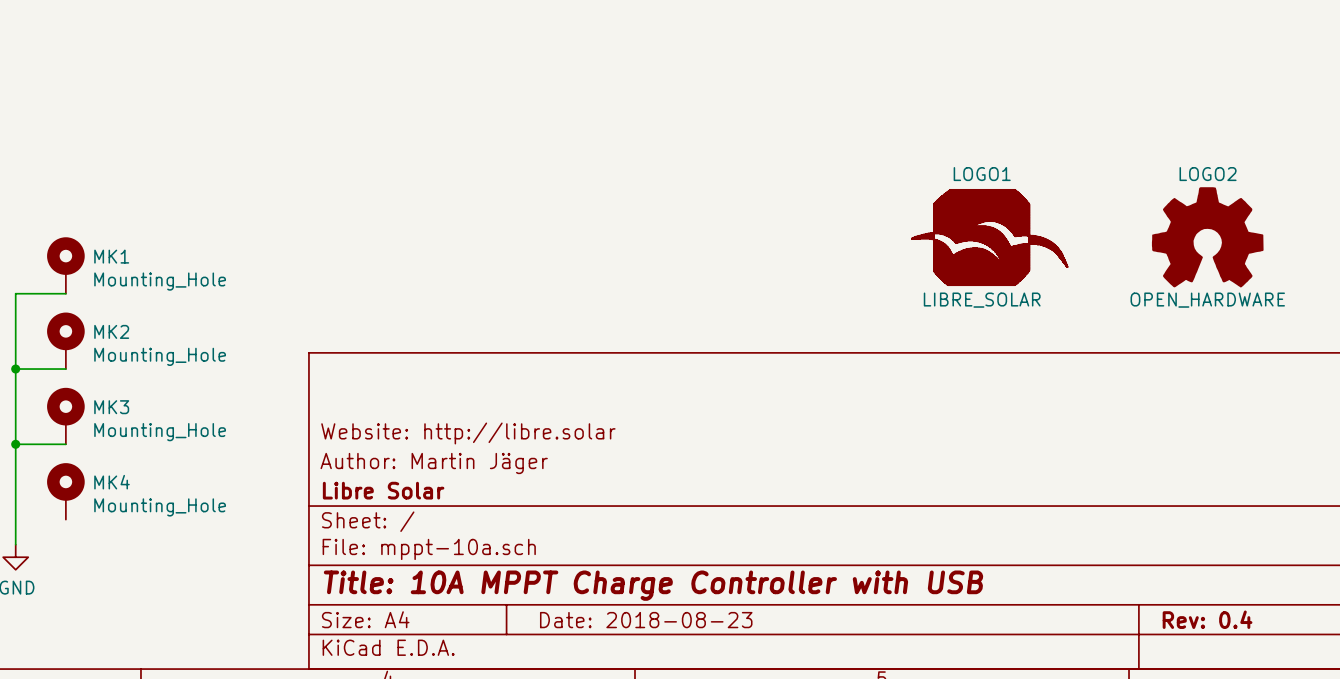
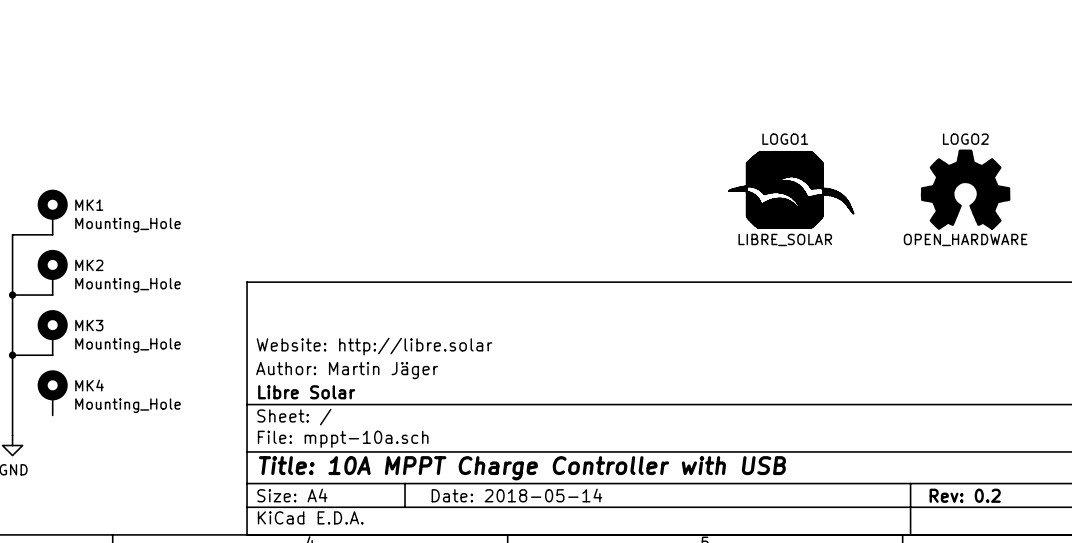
title block: Rev: 0.4 (1207, 619) -> Rev: 0.2 (965, 495)
title block: Date: 2018-08-23 (646, 620) -> Date: 2018-05-14 (516, 495)

